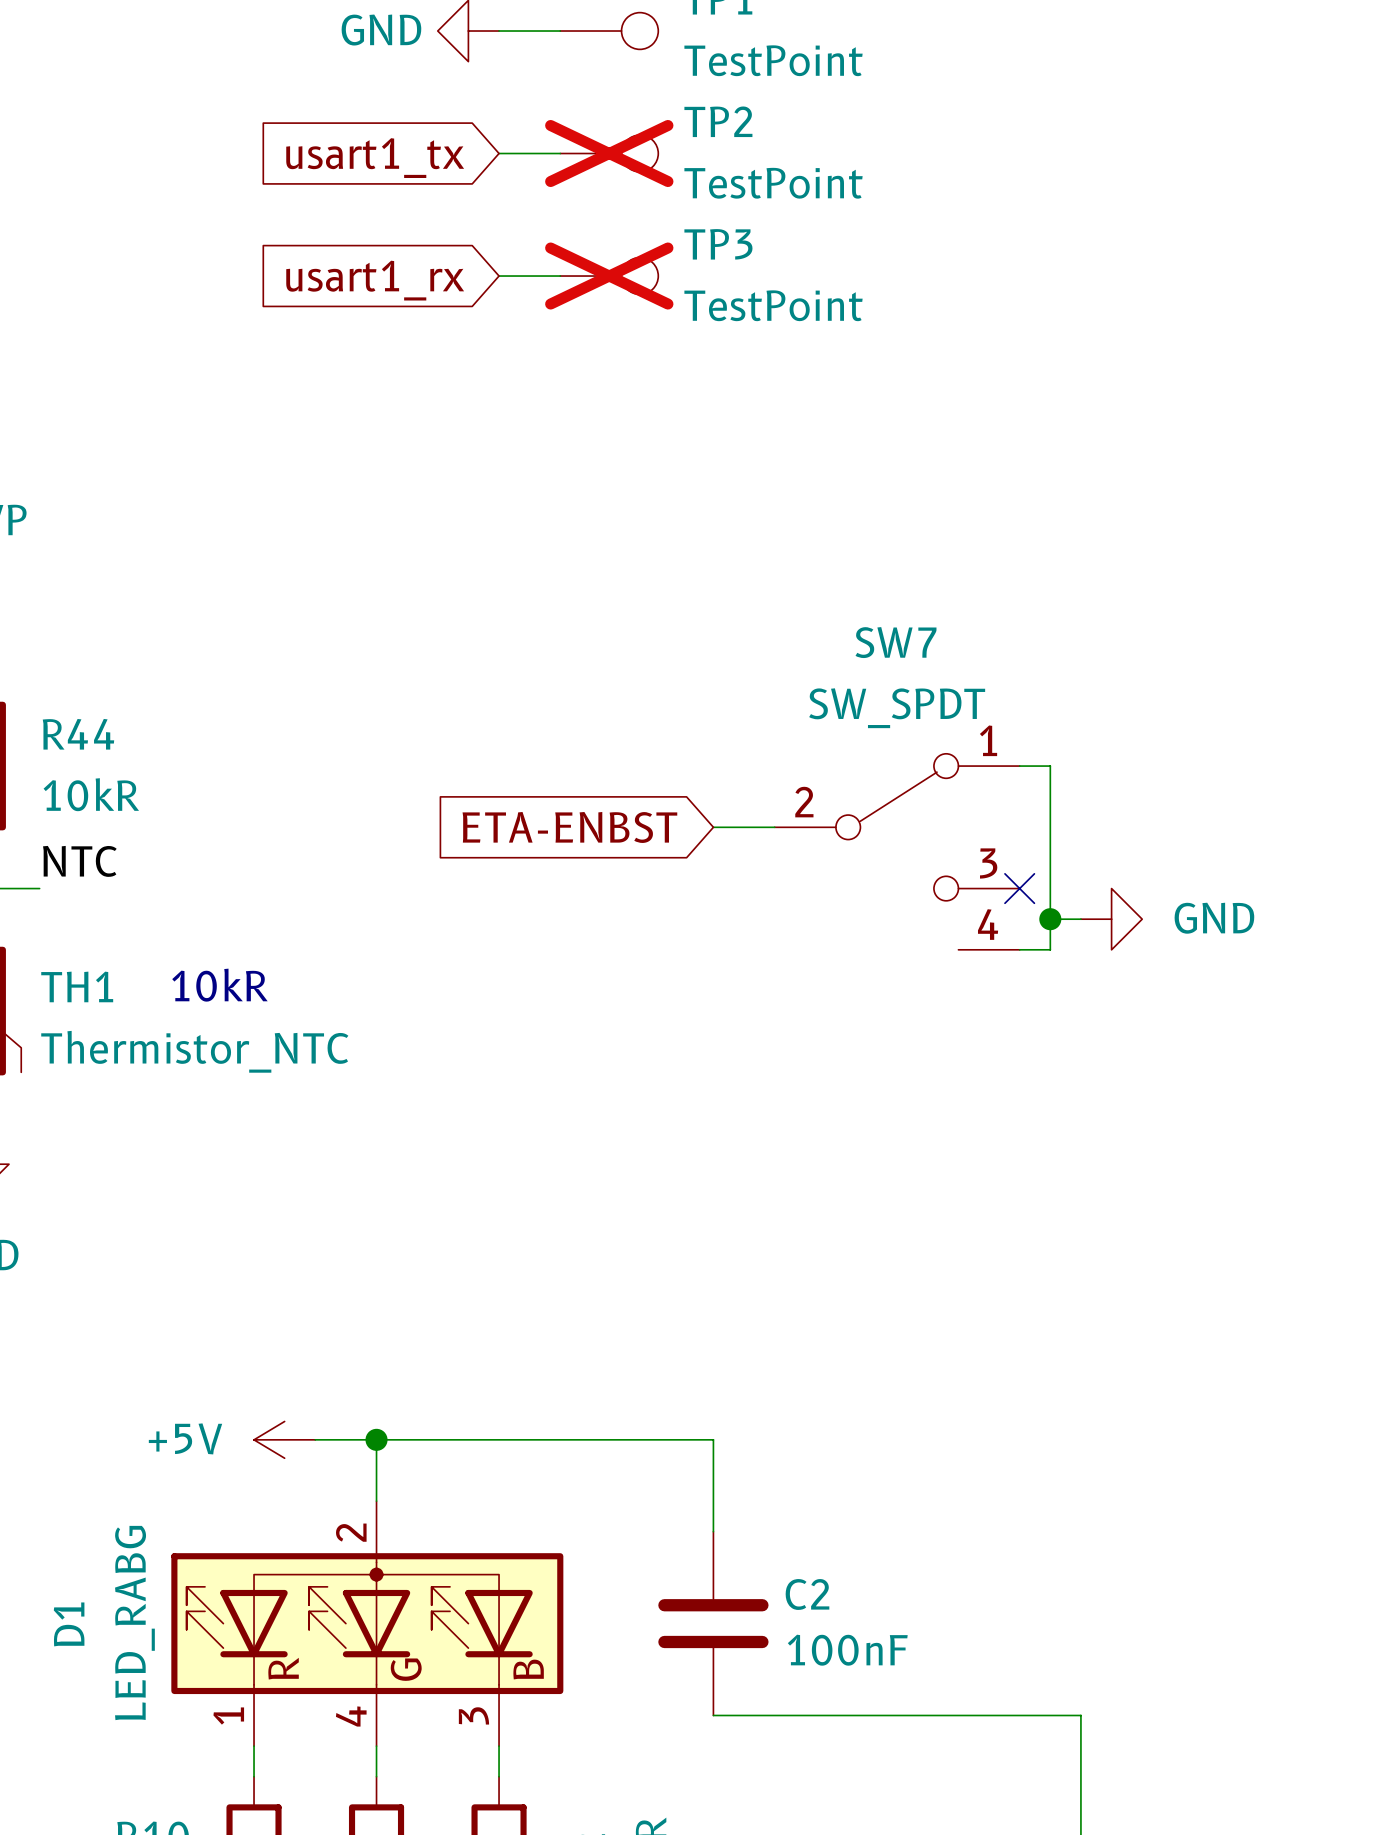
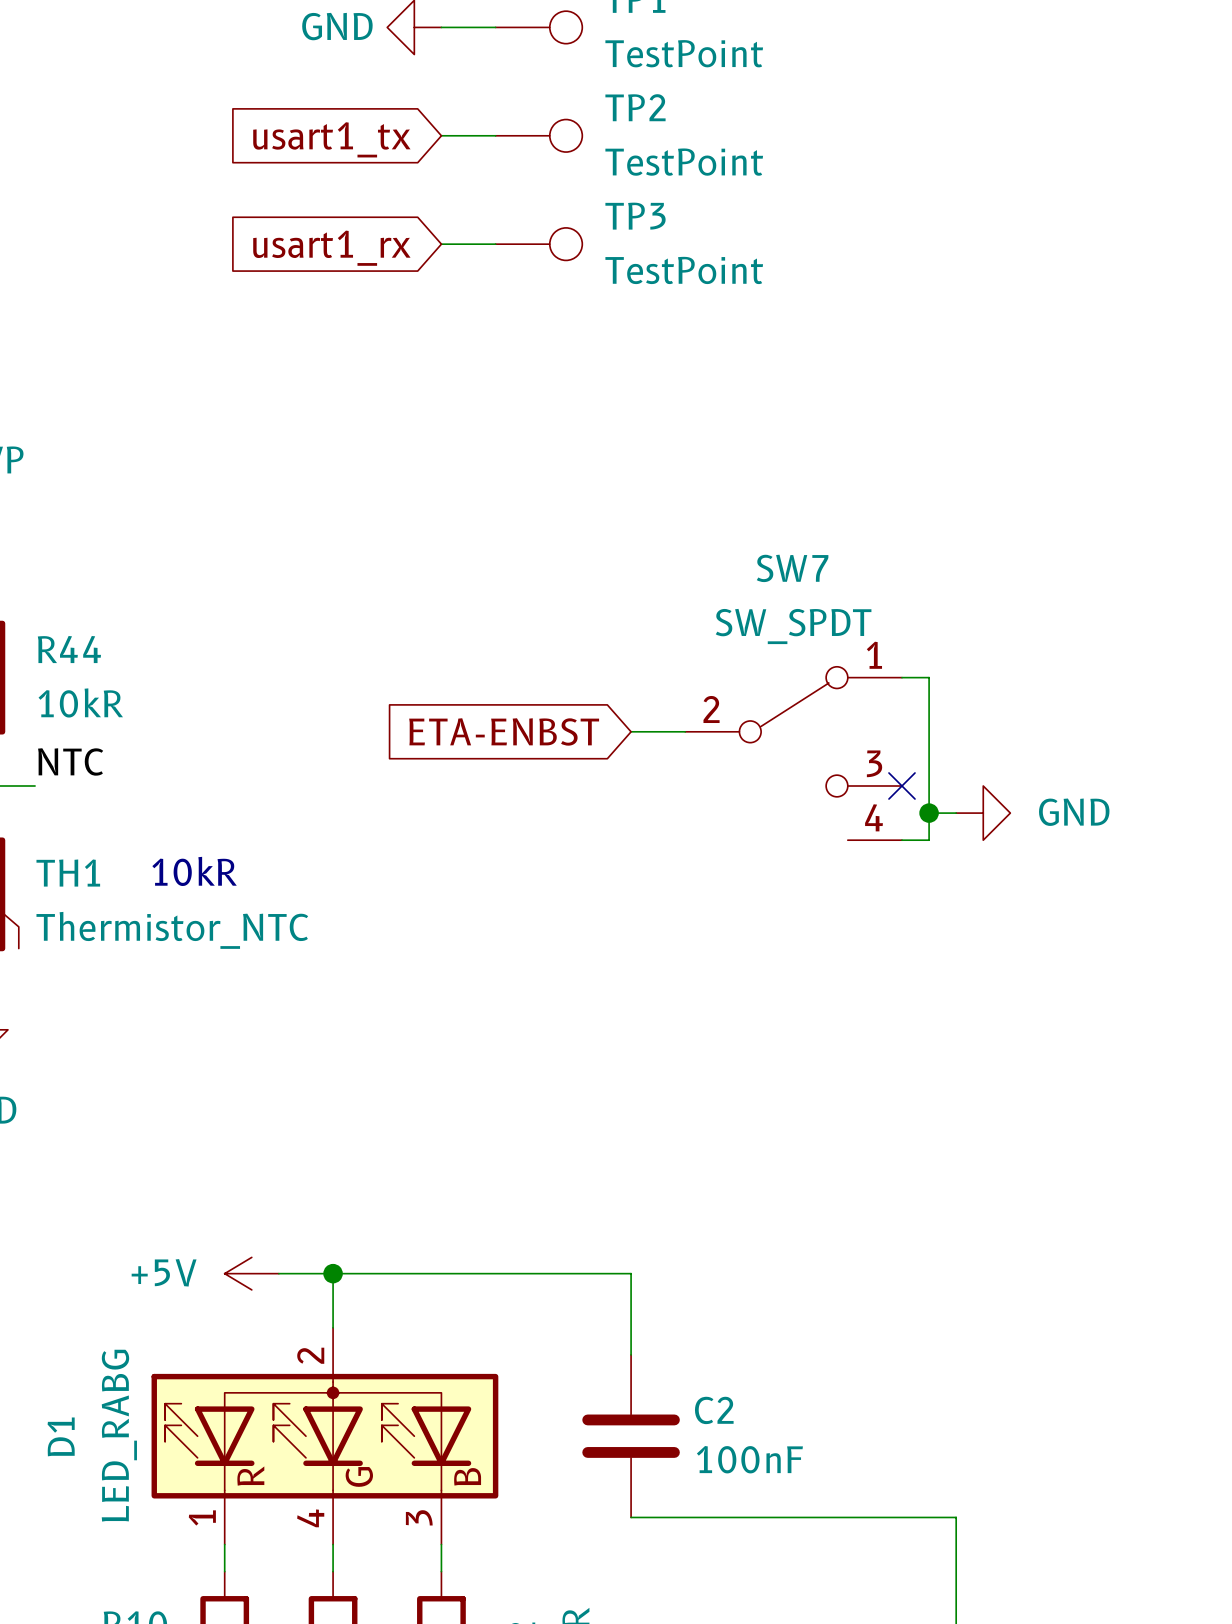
TP2 do-not-place cross: (609, 153) -> none
TP3 do-not-place cross: (609, 276) -> none

